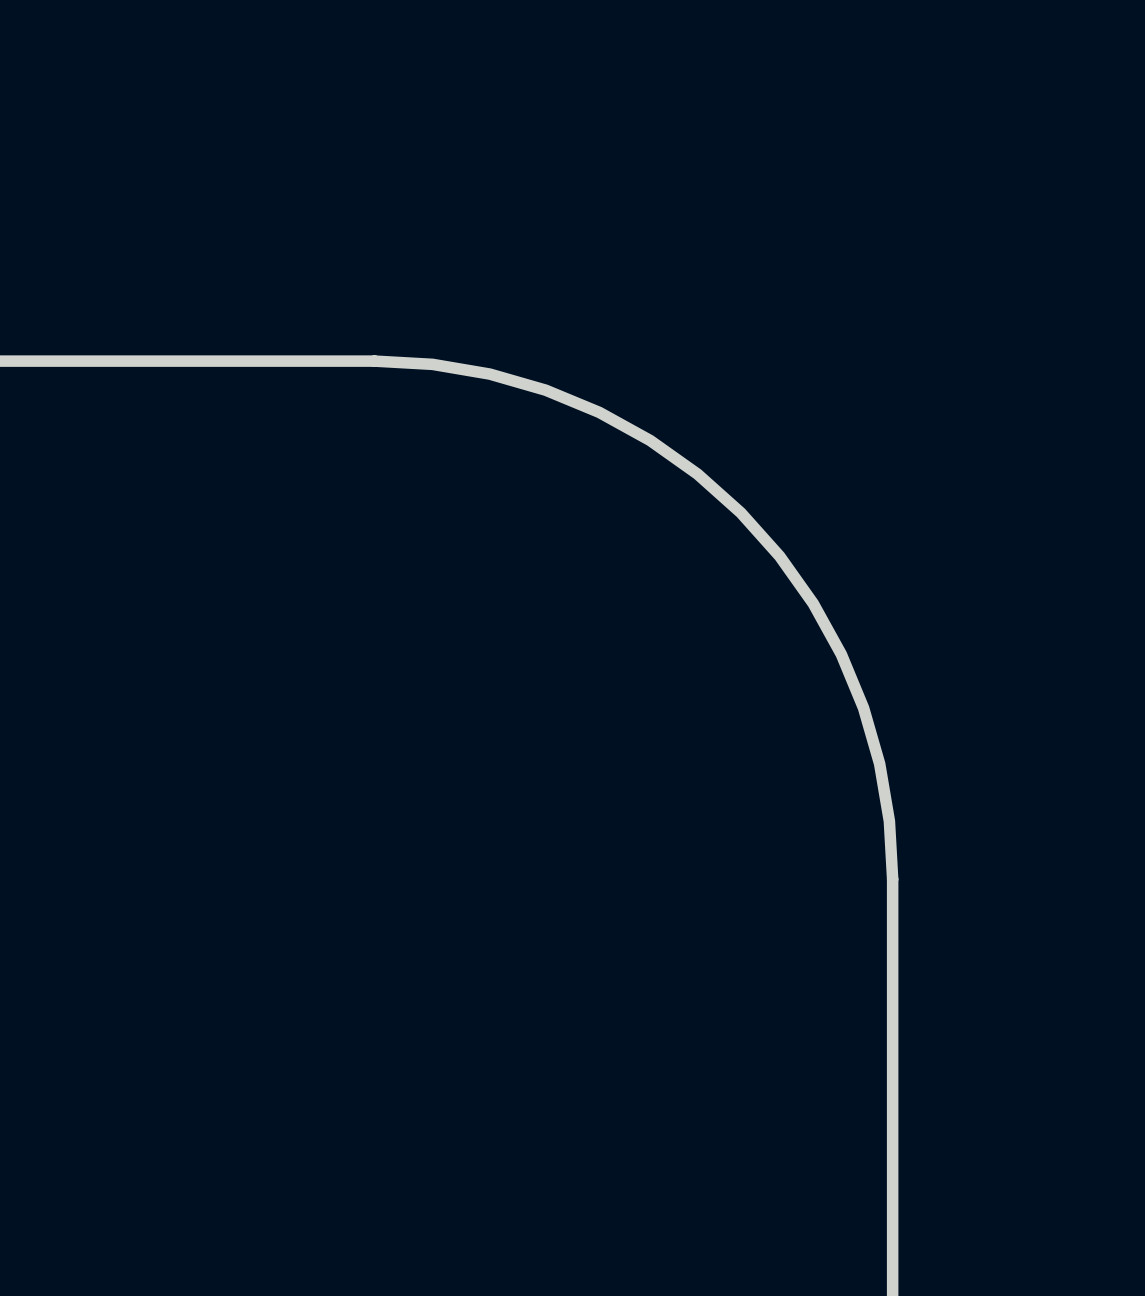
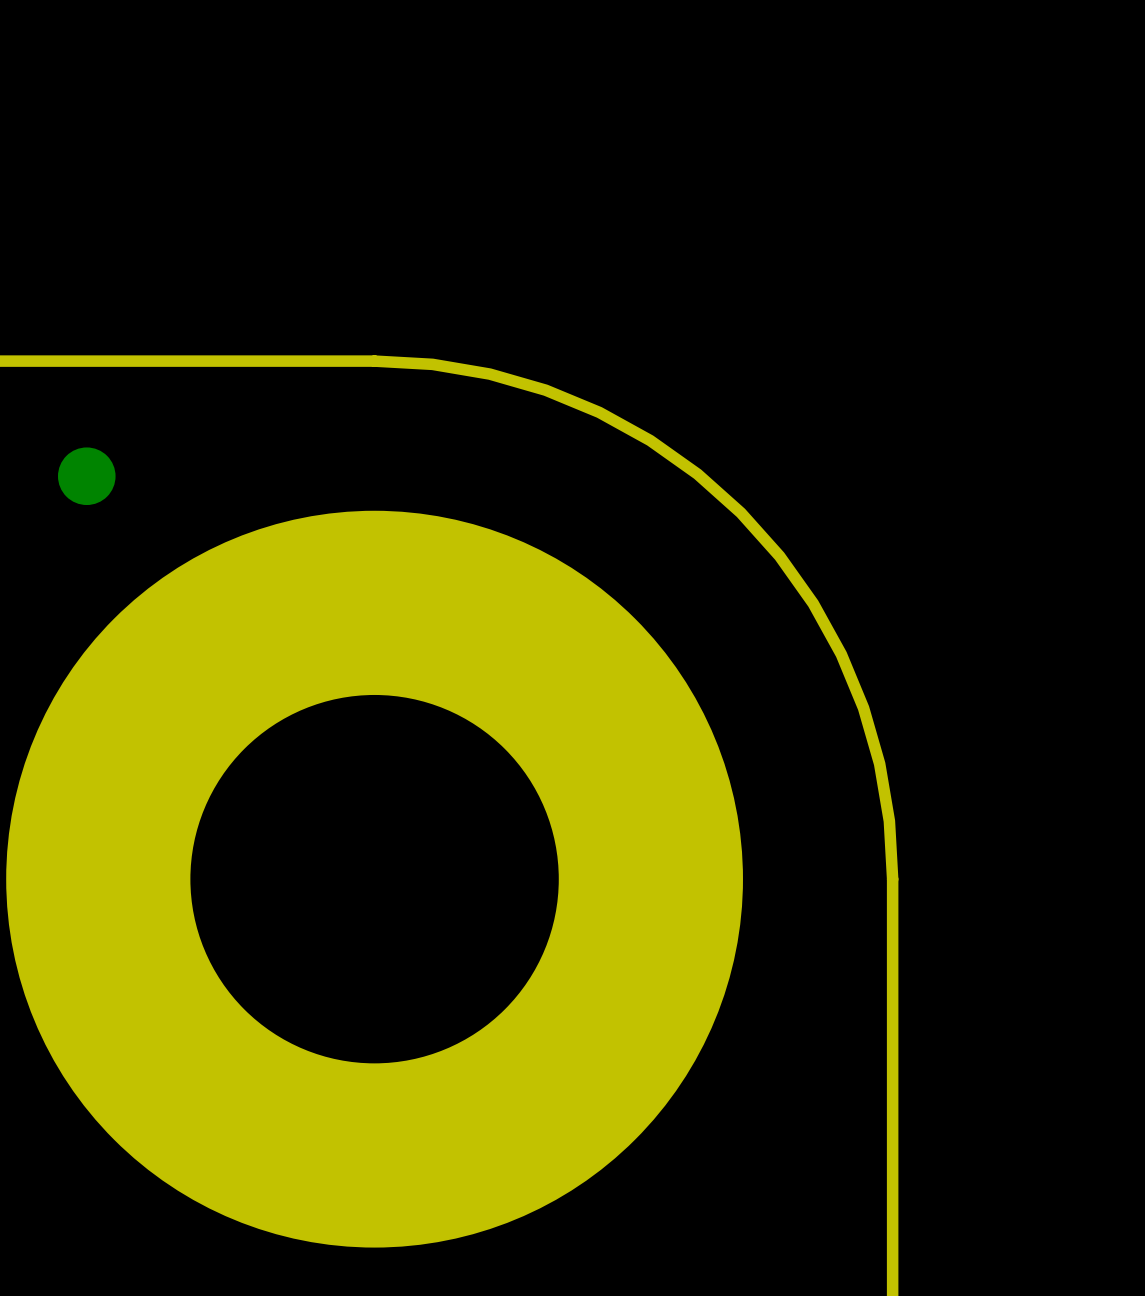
part: none -> (86, 476)
part: none -> (374, 879)

